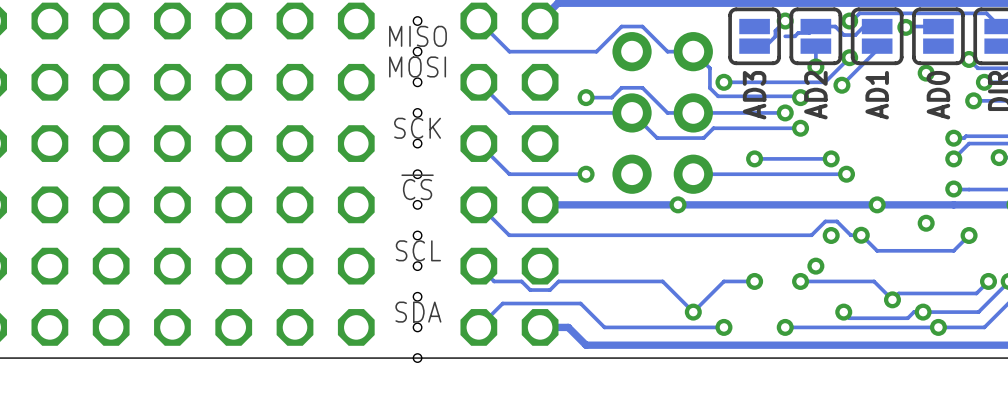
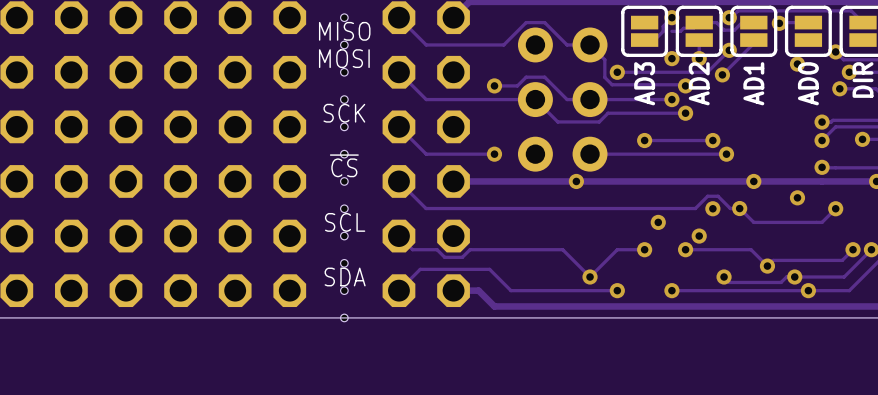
via: none -> (671, 58)
via: none -> (658, 222)

